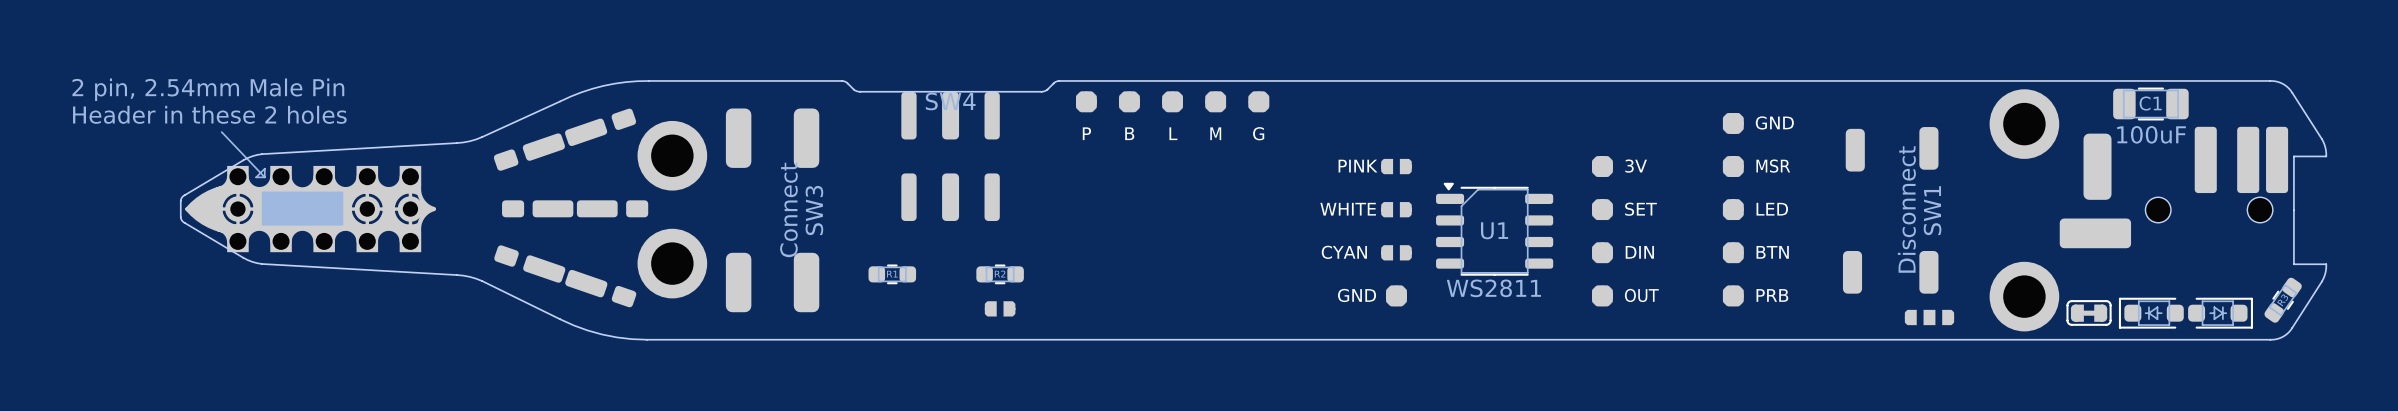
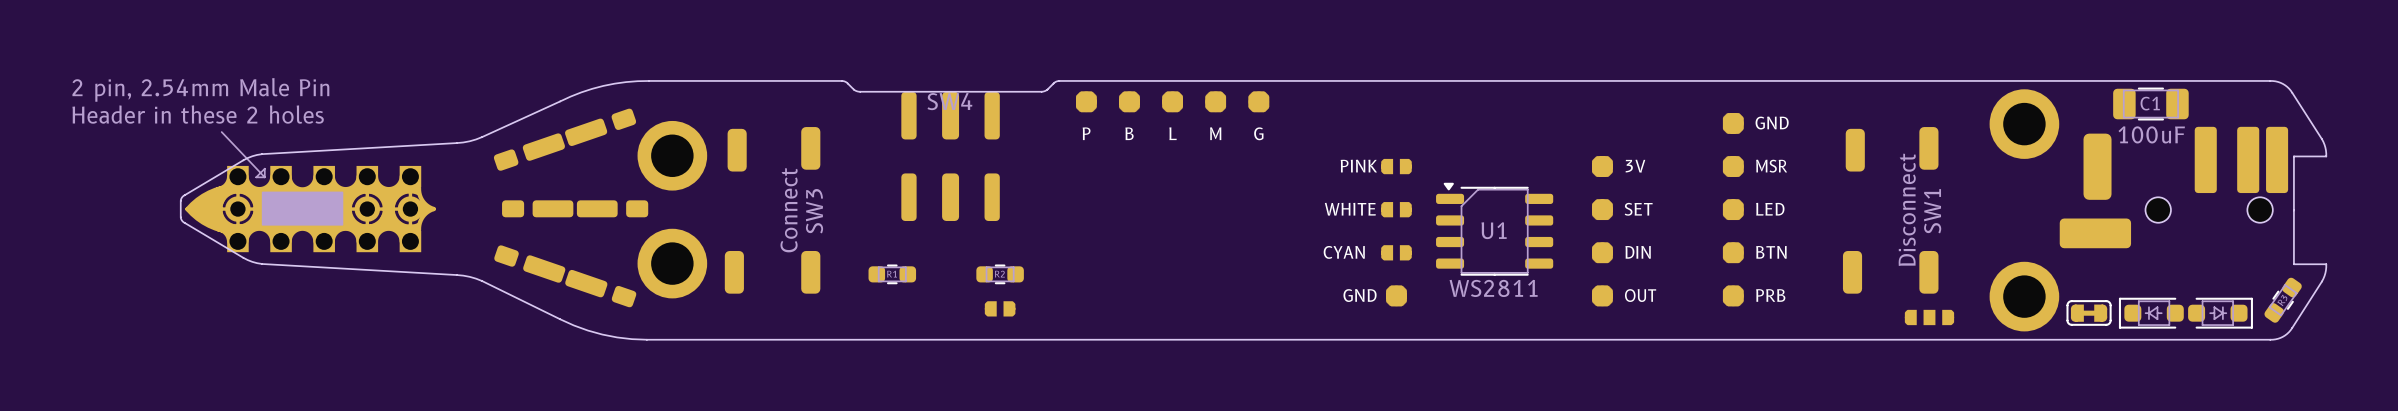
SW3 footprint: [725, 108, 820, 313] -> [724, 127, 821, 294]

